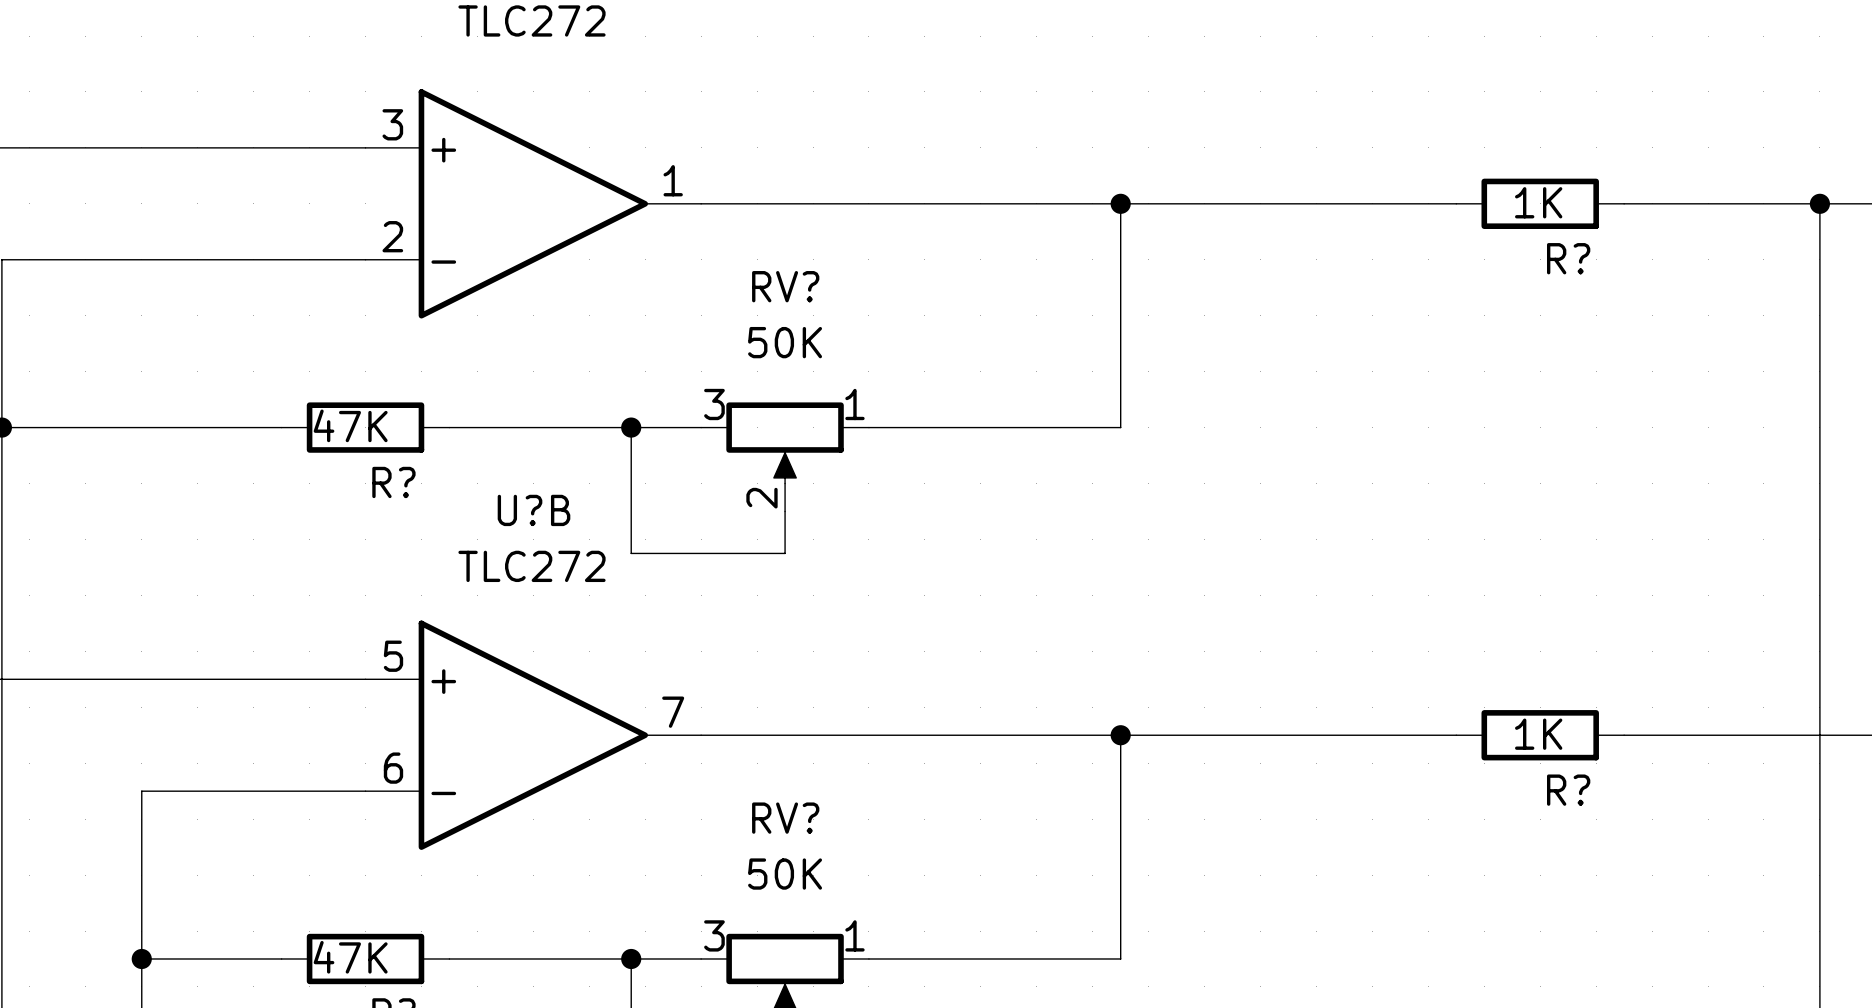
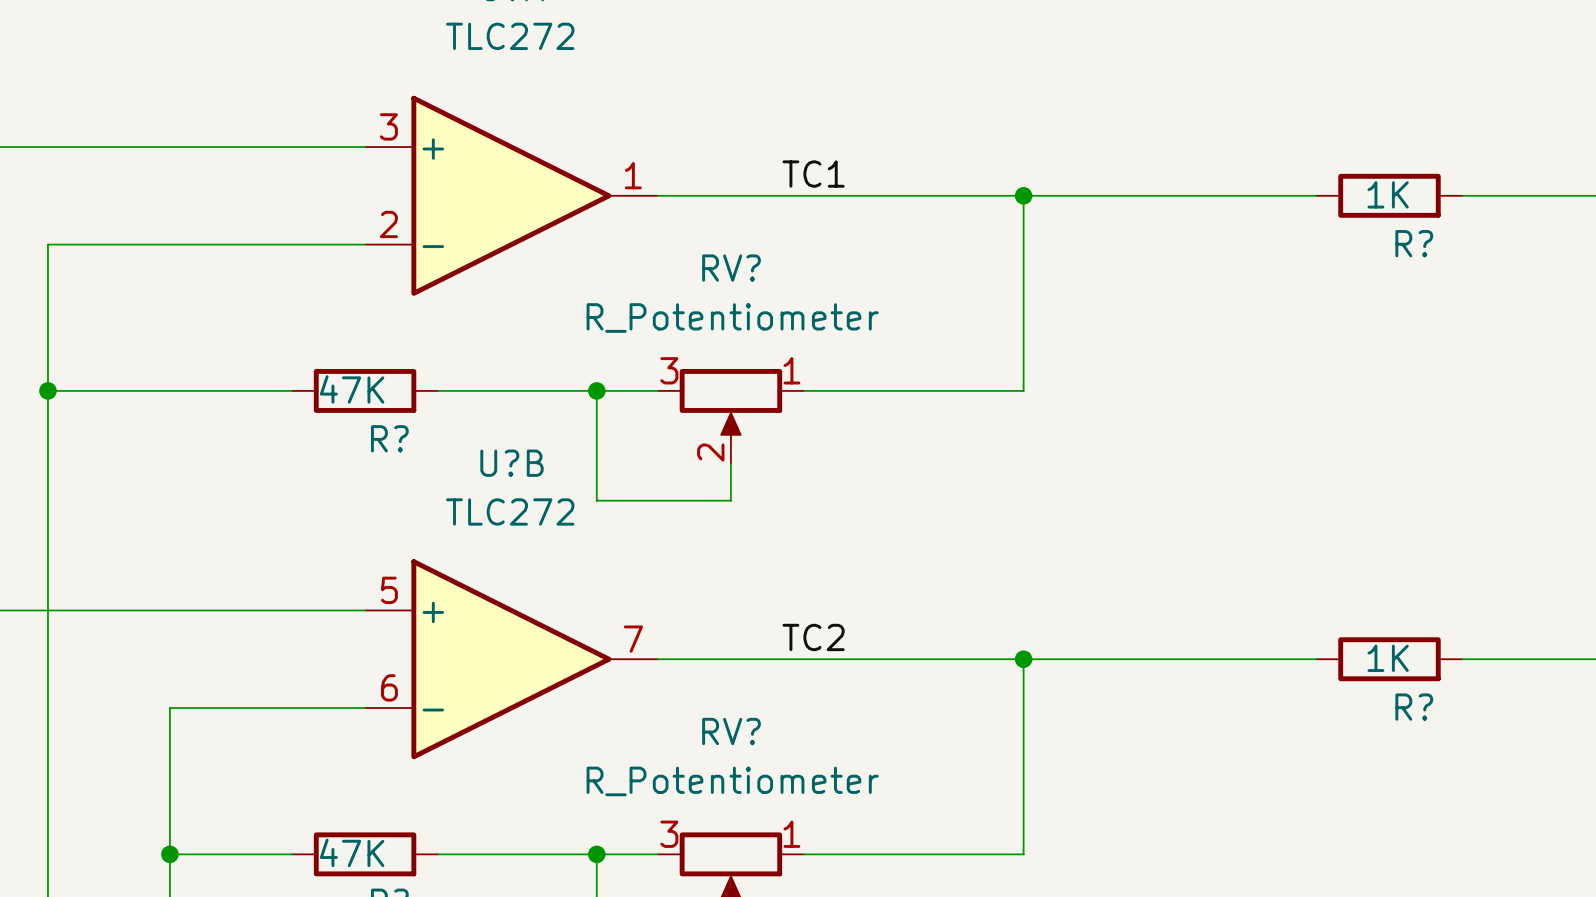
label: none -> TC1 (813, 174)
RV? value: 50K (785, 342) -> R_Potentiometer (732, 318)
label: none -> TC2 (813, 637)
RV? value: 50K (785, 874) -> R_Potentiometer (732, 781)

